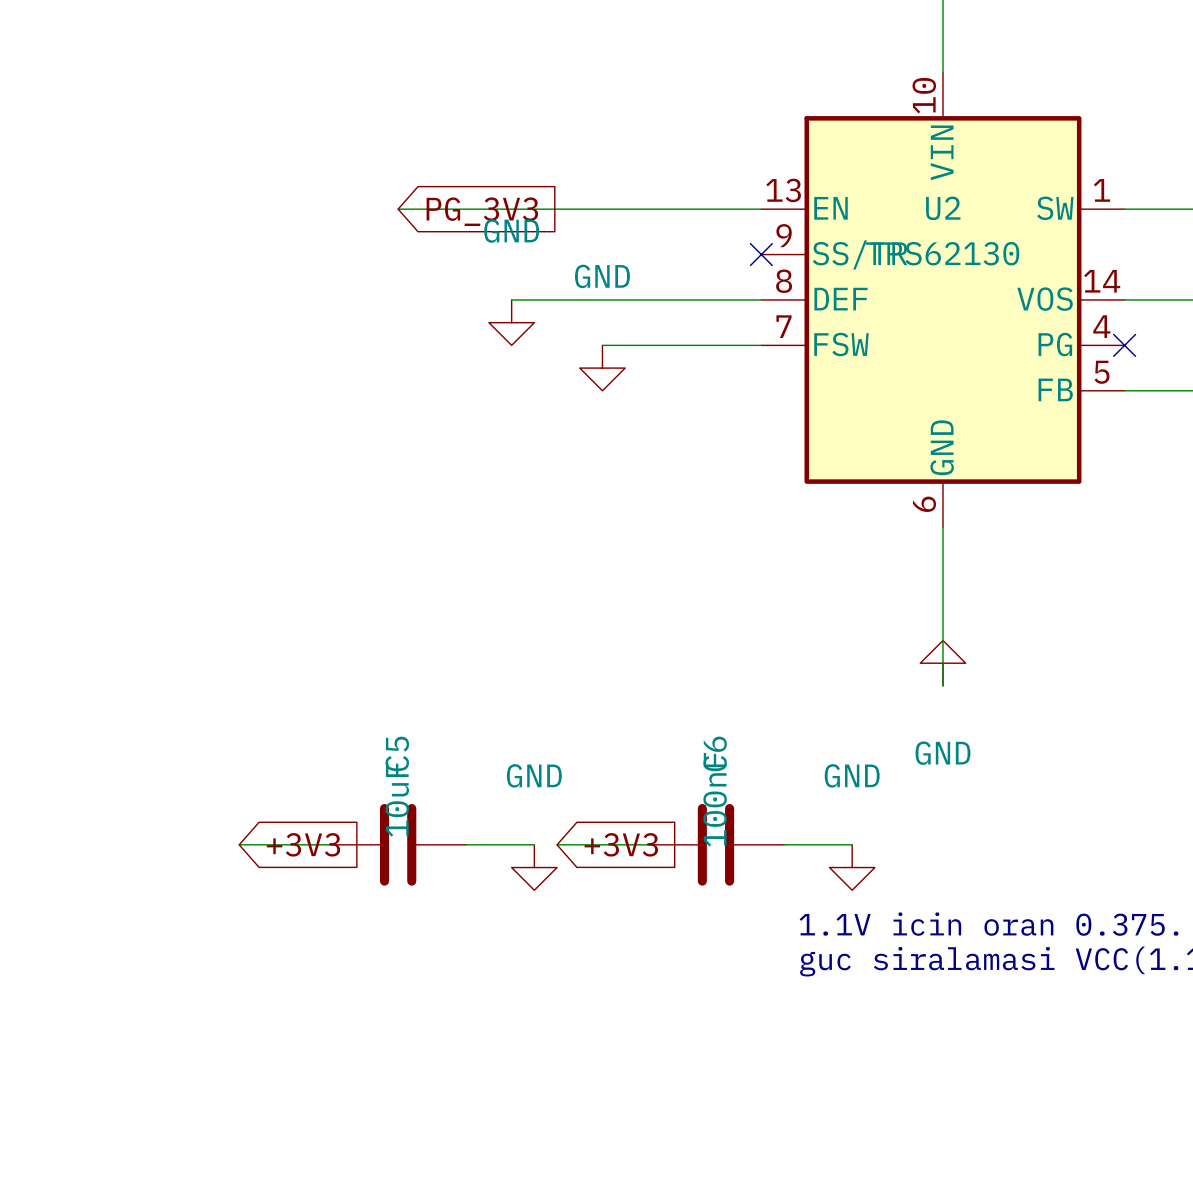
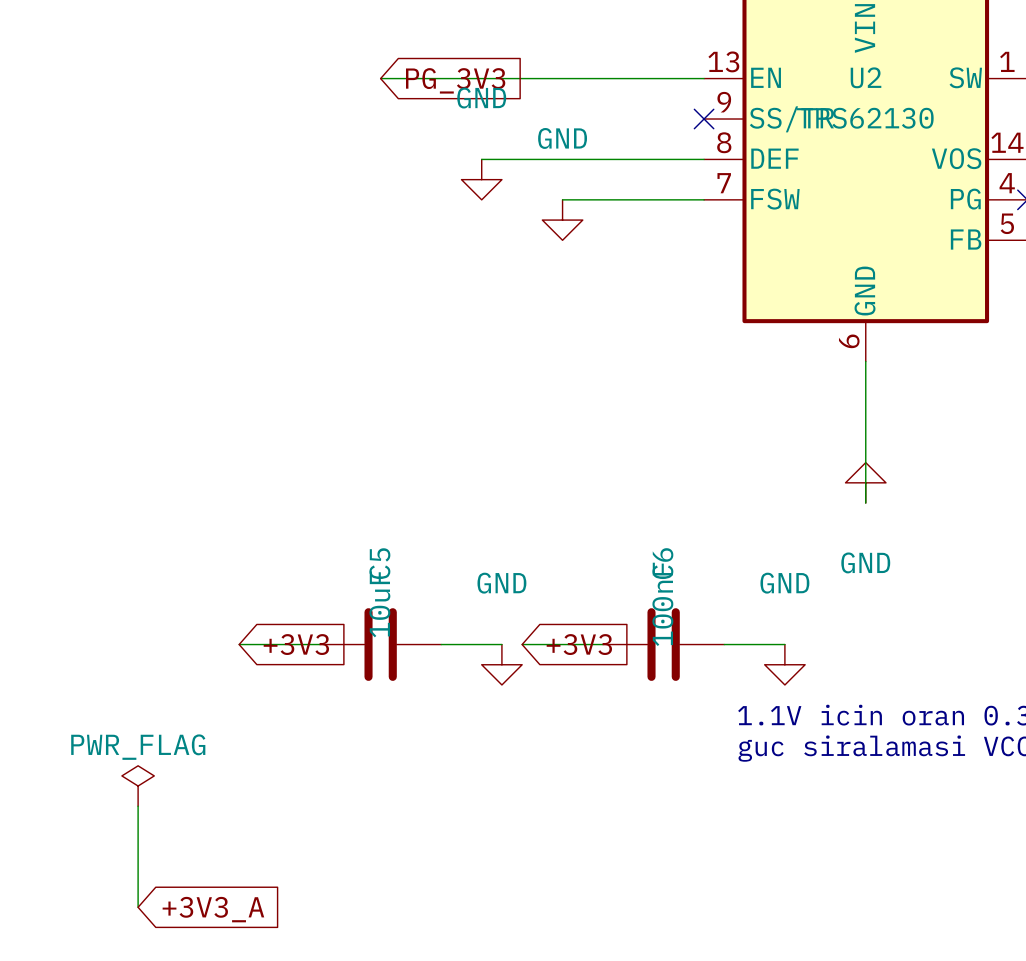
power symbol: none -> PWR_FLAG (138, 786)
wire: none -> (138, 806) (138, 907)
global label: none -> +3V3_A (213, 909)

